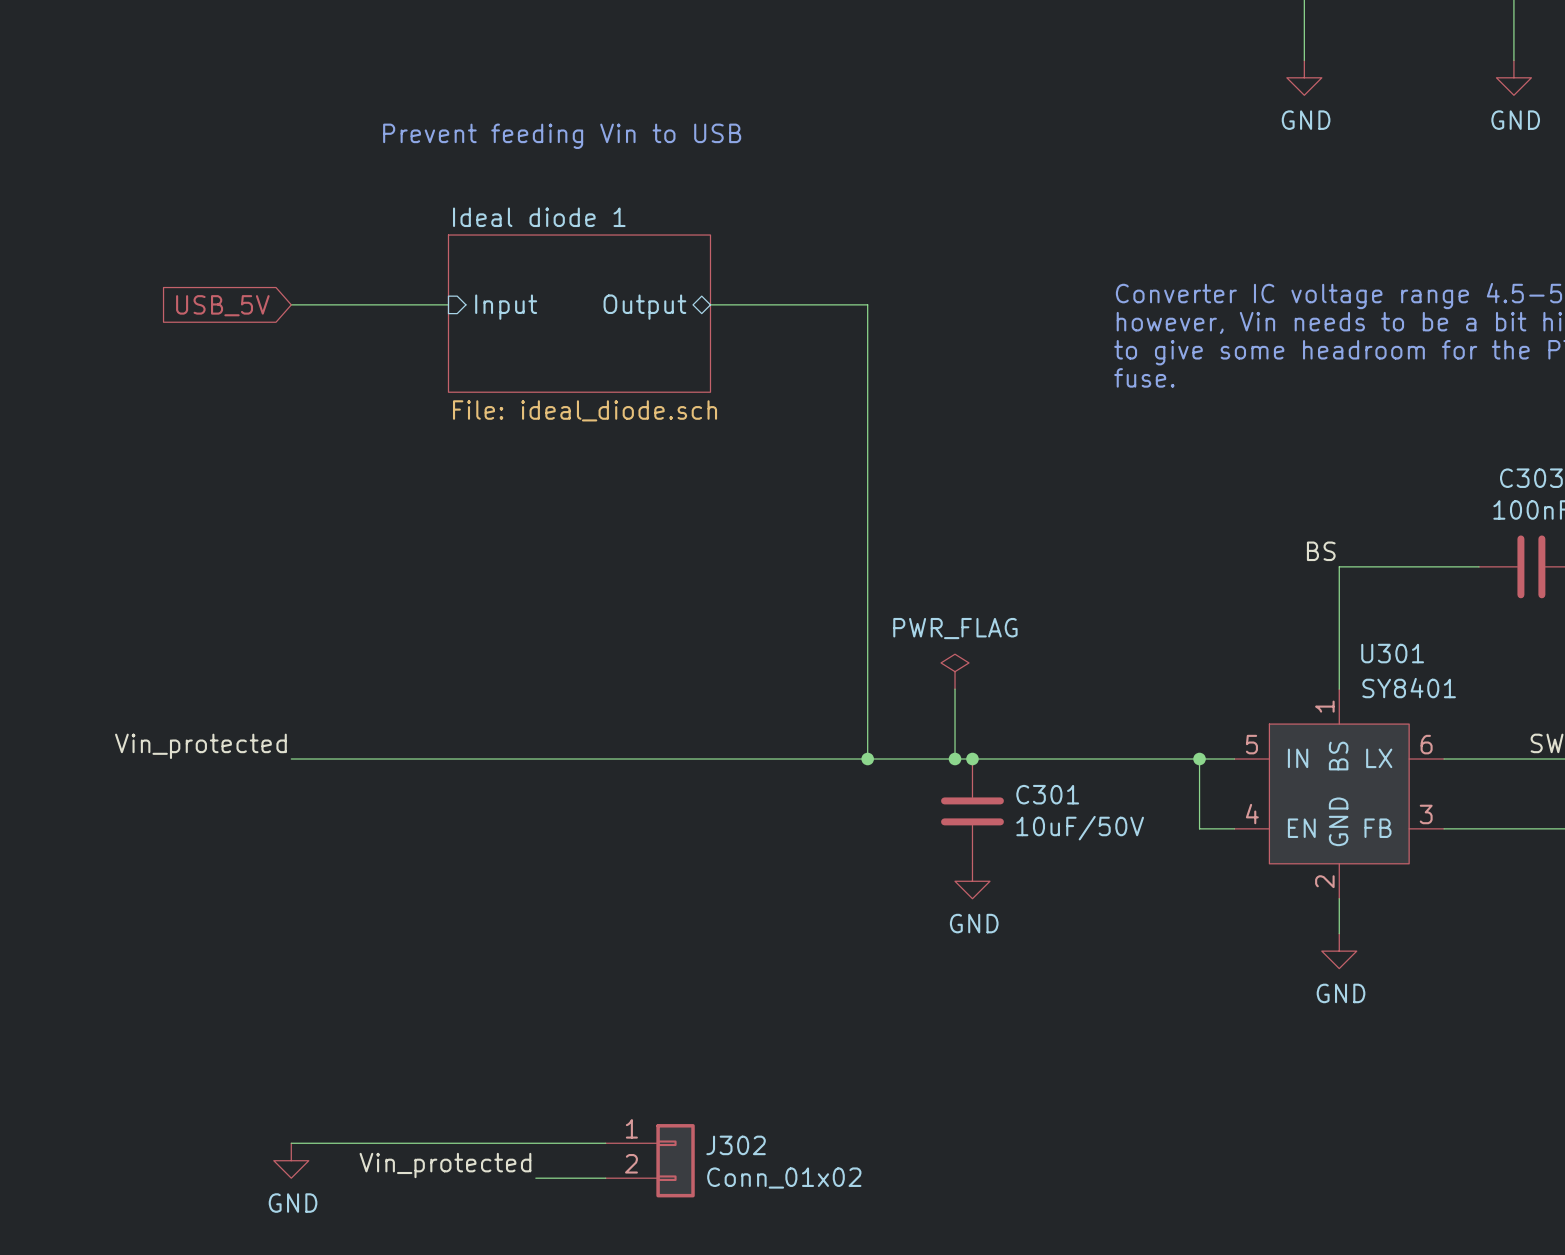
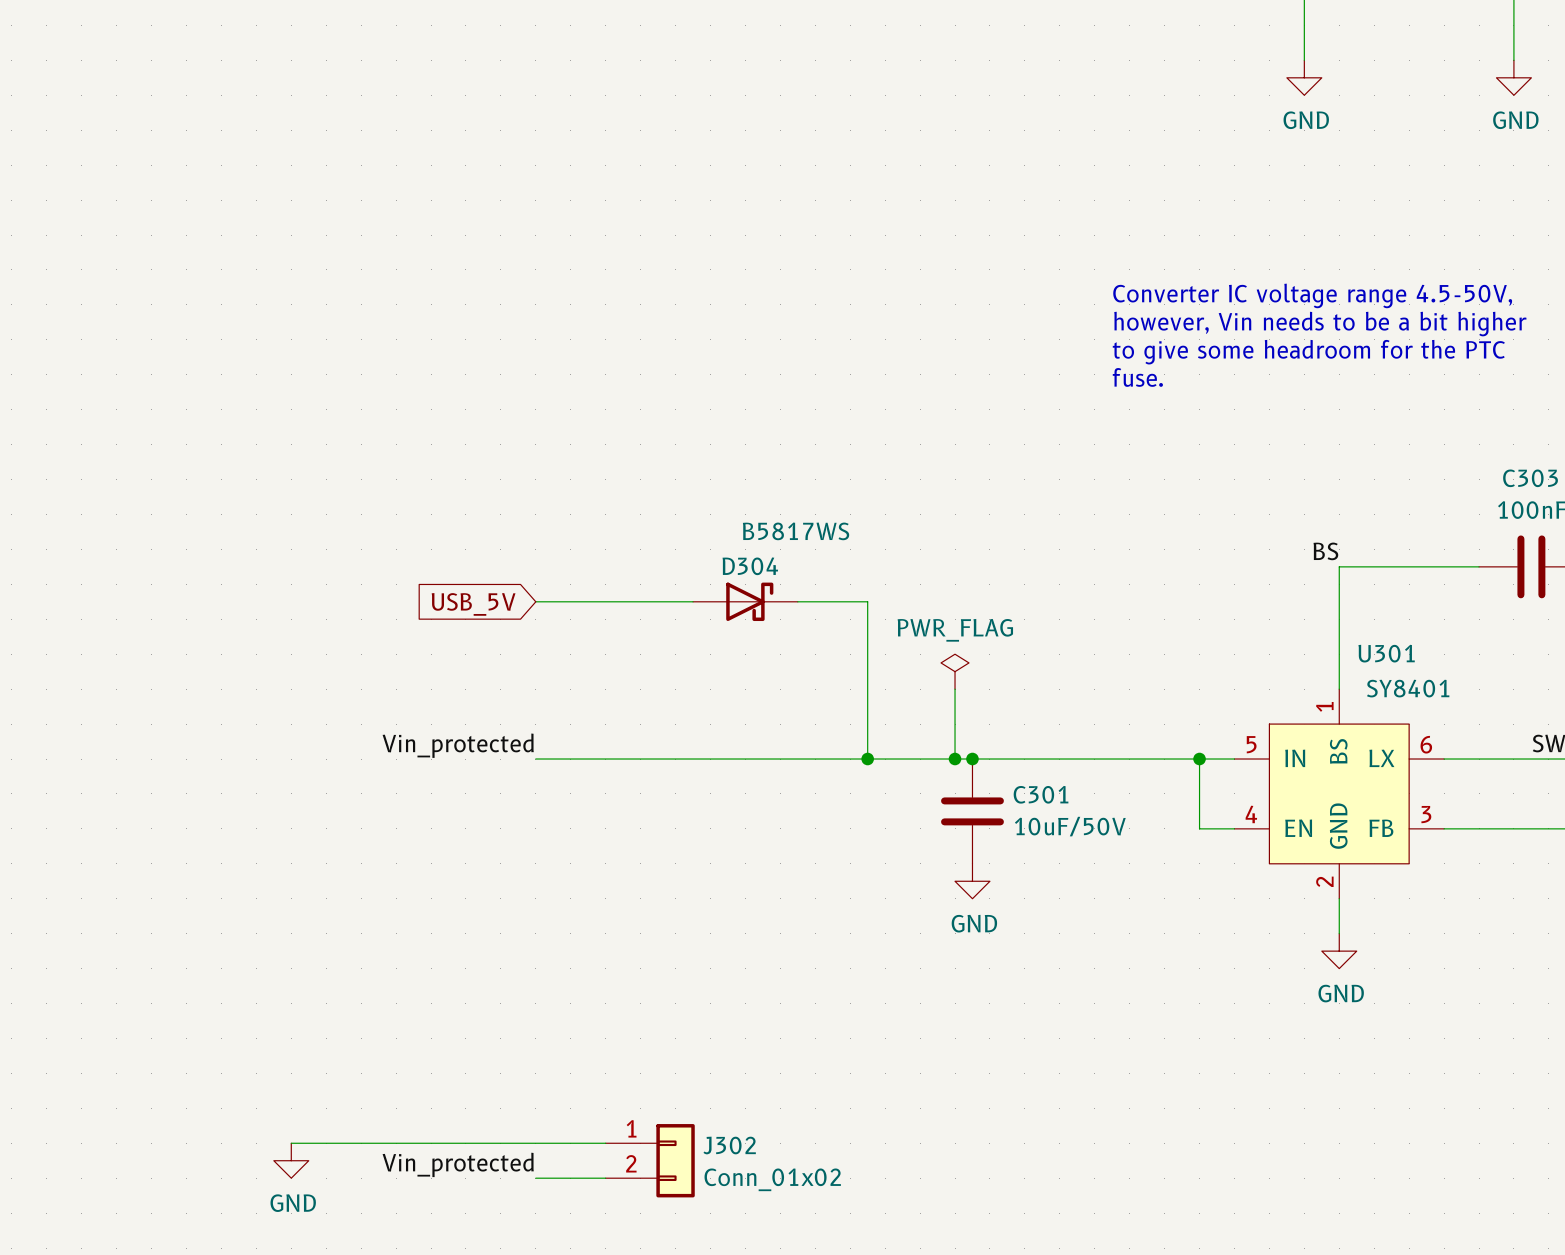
text: Prevent feeding Vin to USB (562, 136) -> none
wire: (291, 304) (448, 304) -> none
wire: (710, 304) (867, 304) (867, 601) -> (797, 601) (867, 601)
global label: USB_5V (222, 305) -> none
sheet pin: Input (506, 307) -> none
sheet pin: Output (644, 307) -> none
sheet Ideal diode 1: File: ideal_diode.sch (579, 313) -> none
wire: none -> (535, 601) (693, 601)
D304: none -> B5817WS (745, 601)
global label: none -> USB_5V (473, 604)
label position: Vin_protected (200, 746) -> Vin_protected (458, 745)
wire: (291, 759) (535, 759) -> none

